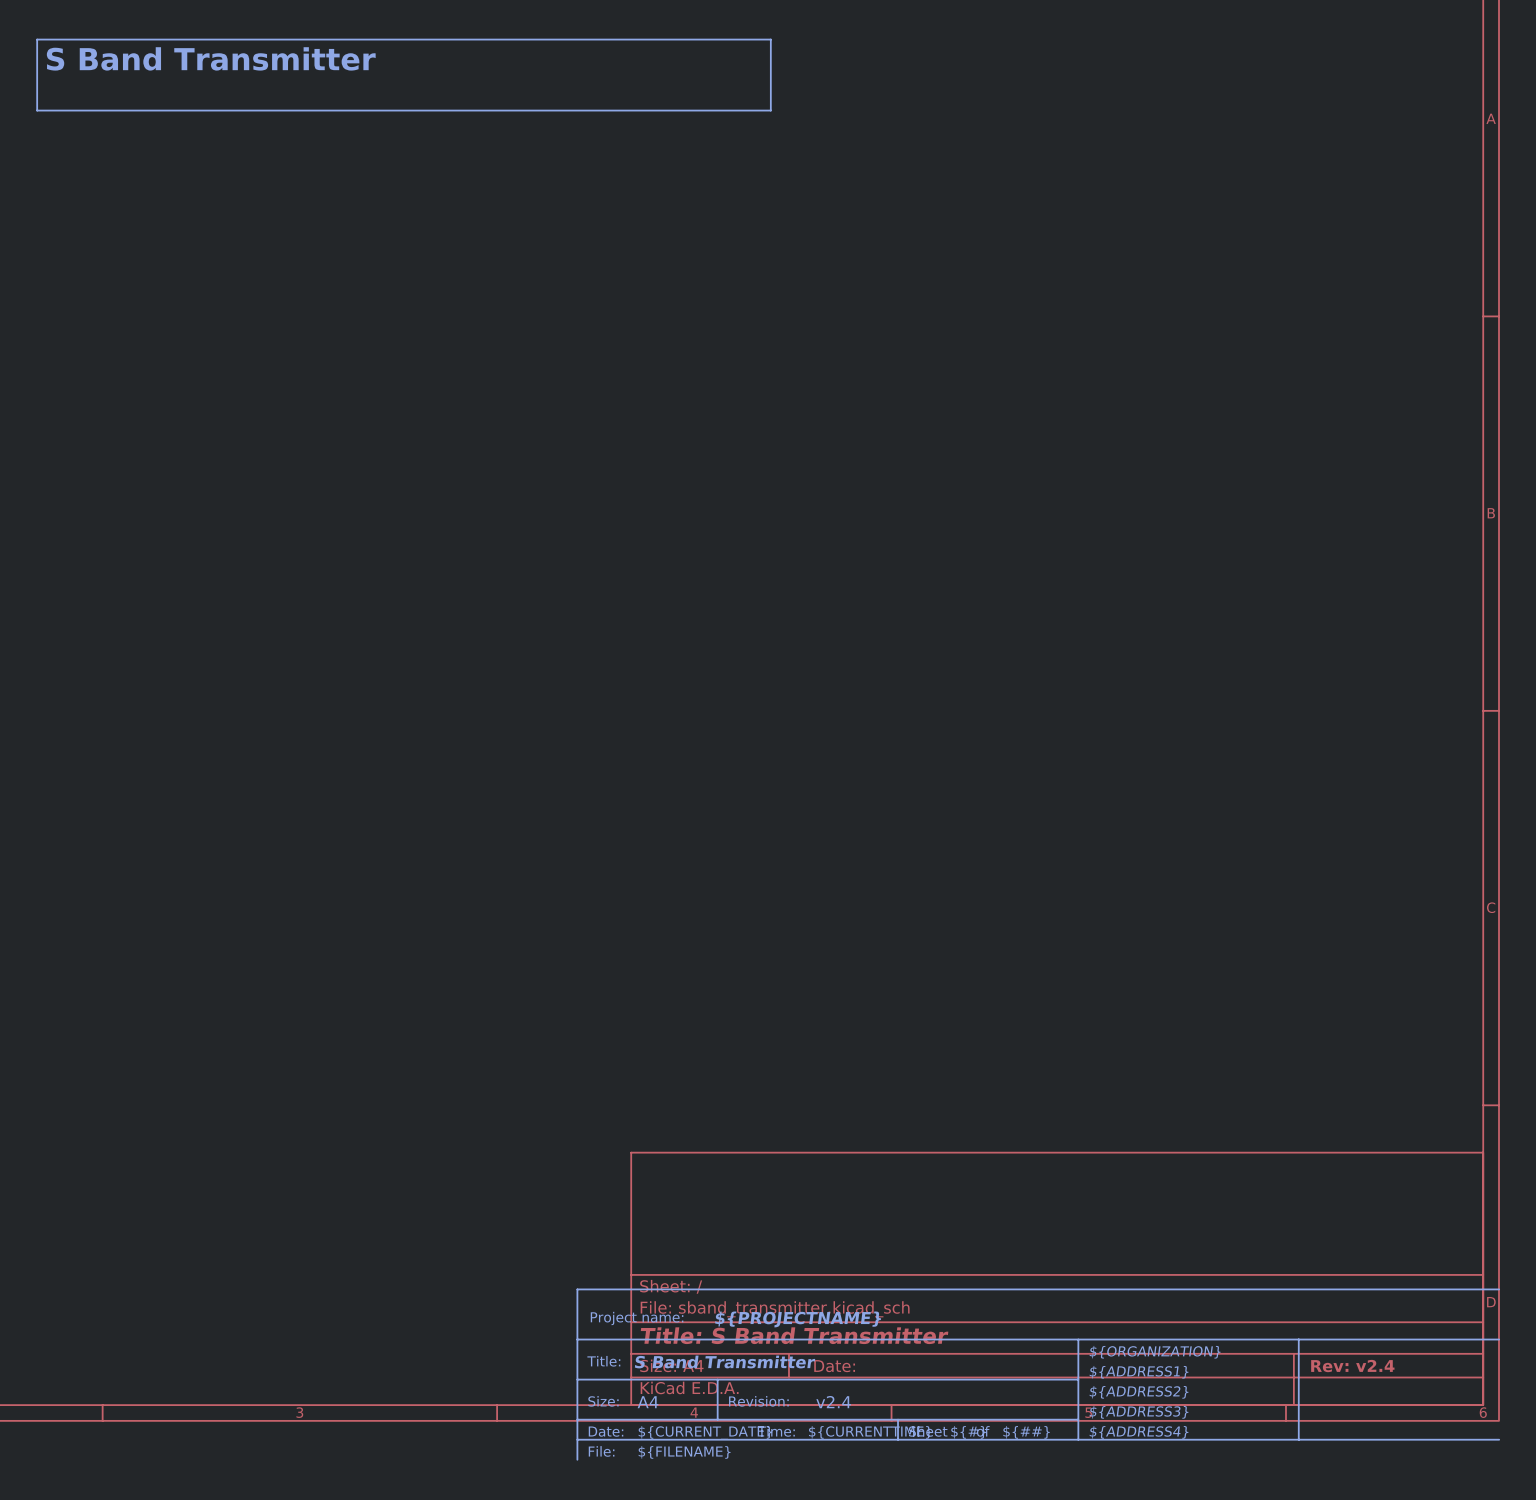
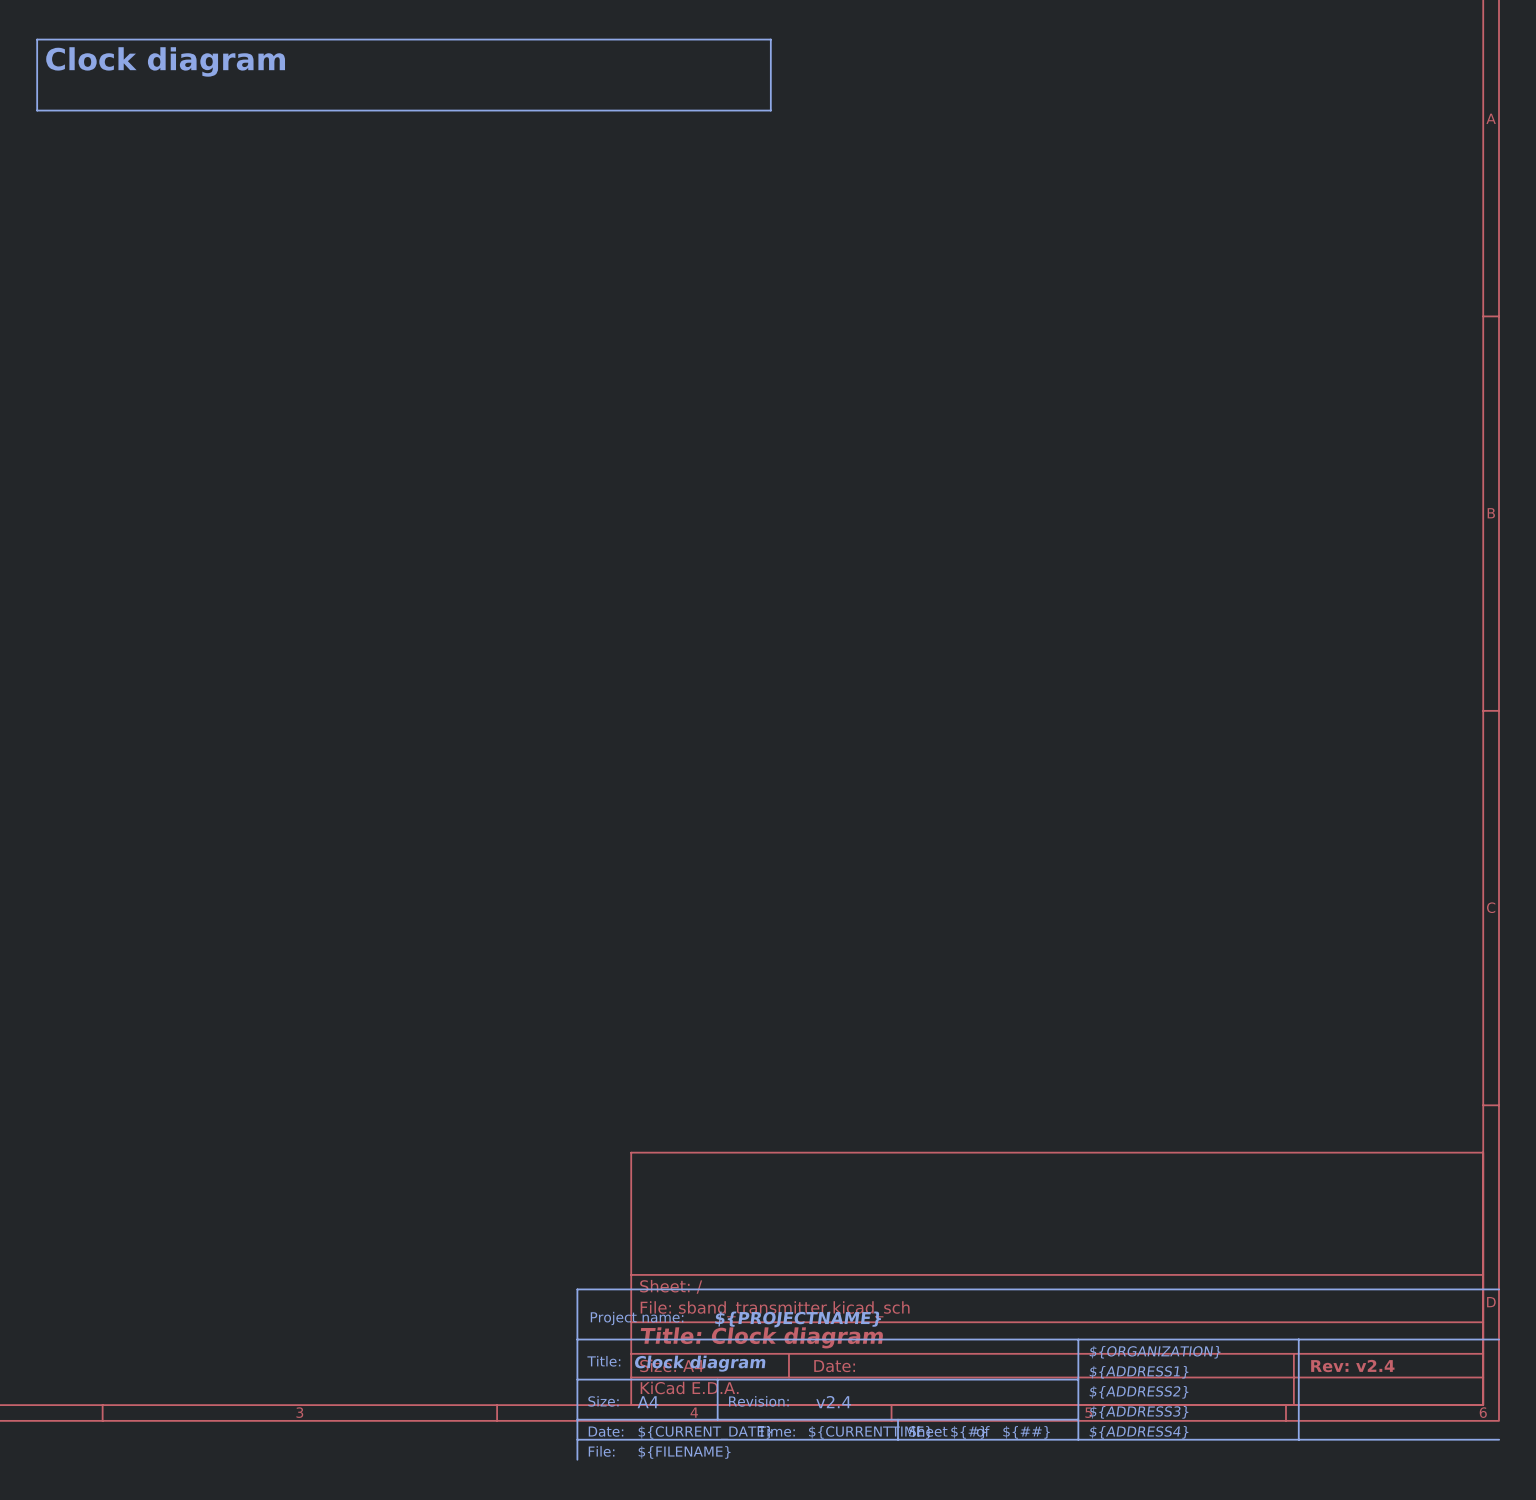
text: S Band Transmitter (211, 58) -> Clock diagram (165, 61)
title block: Title: S Band Transmitter (794, 1335) -> Title: Clock diagram (761, 1337)
text: S Band Transmitter (725, 1361) -> Clock diagram (700, 1363)

